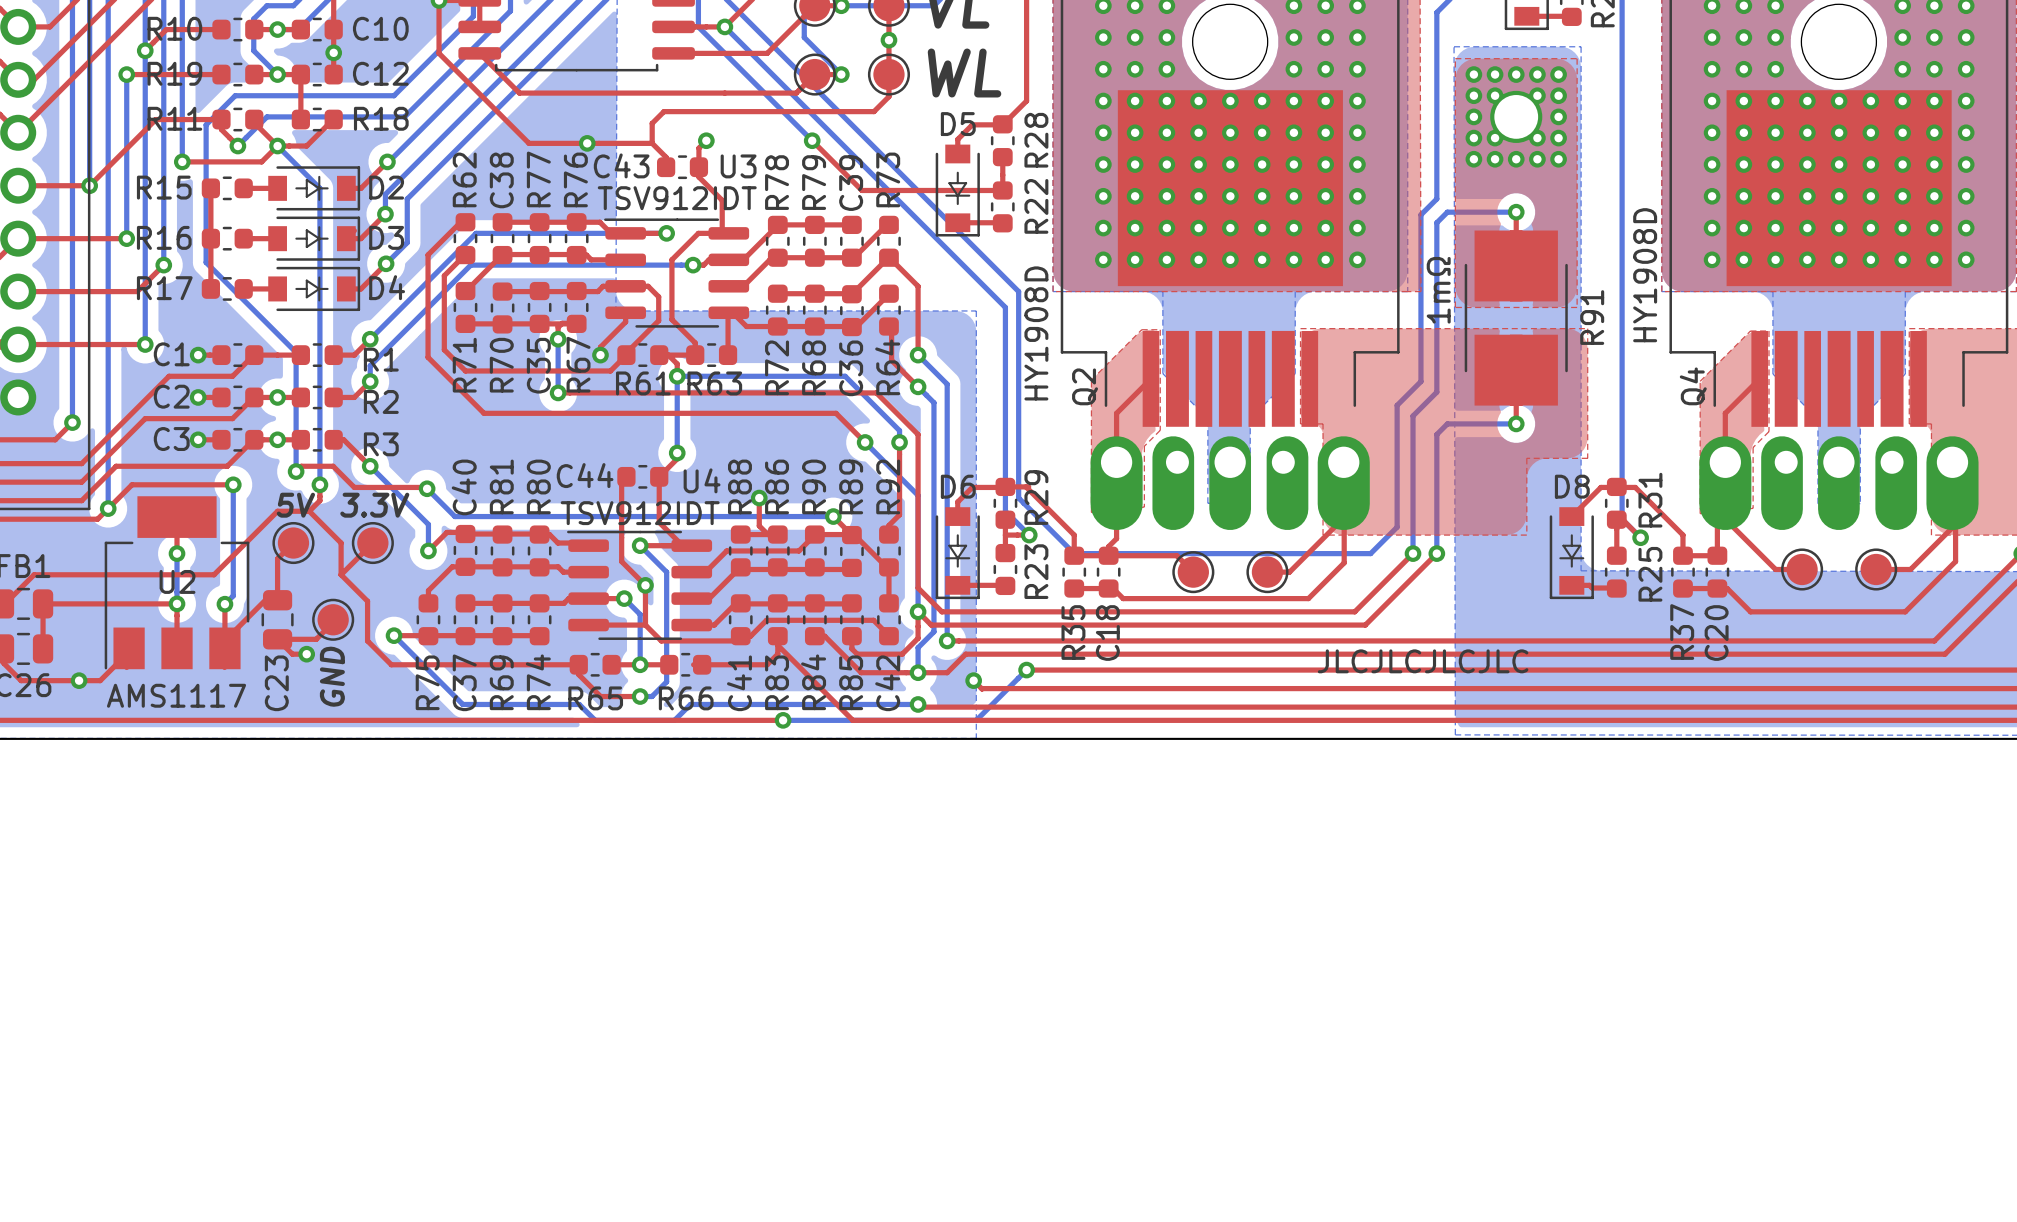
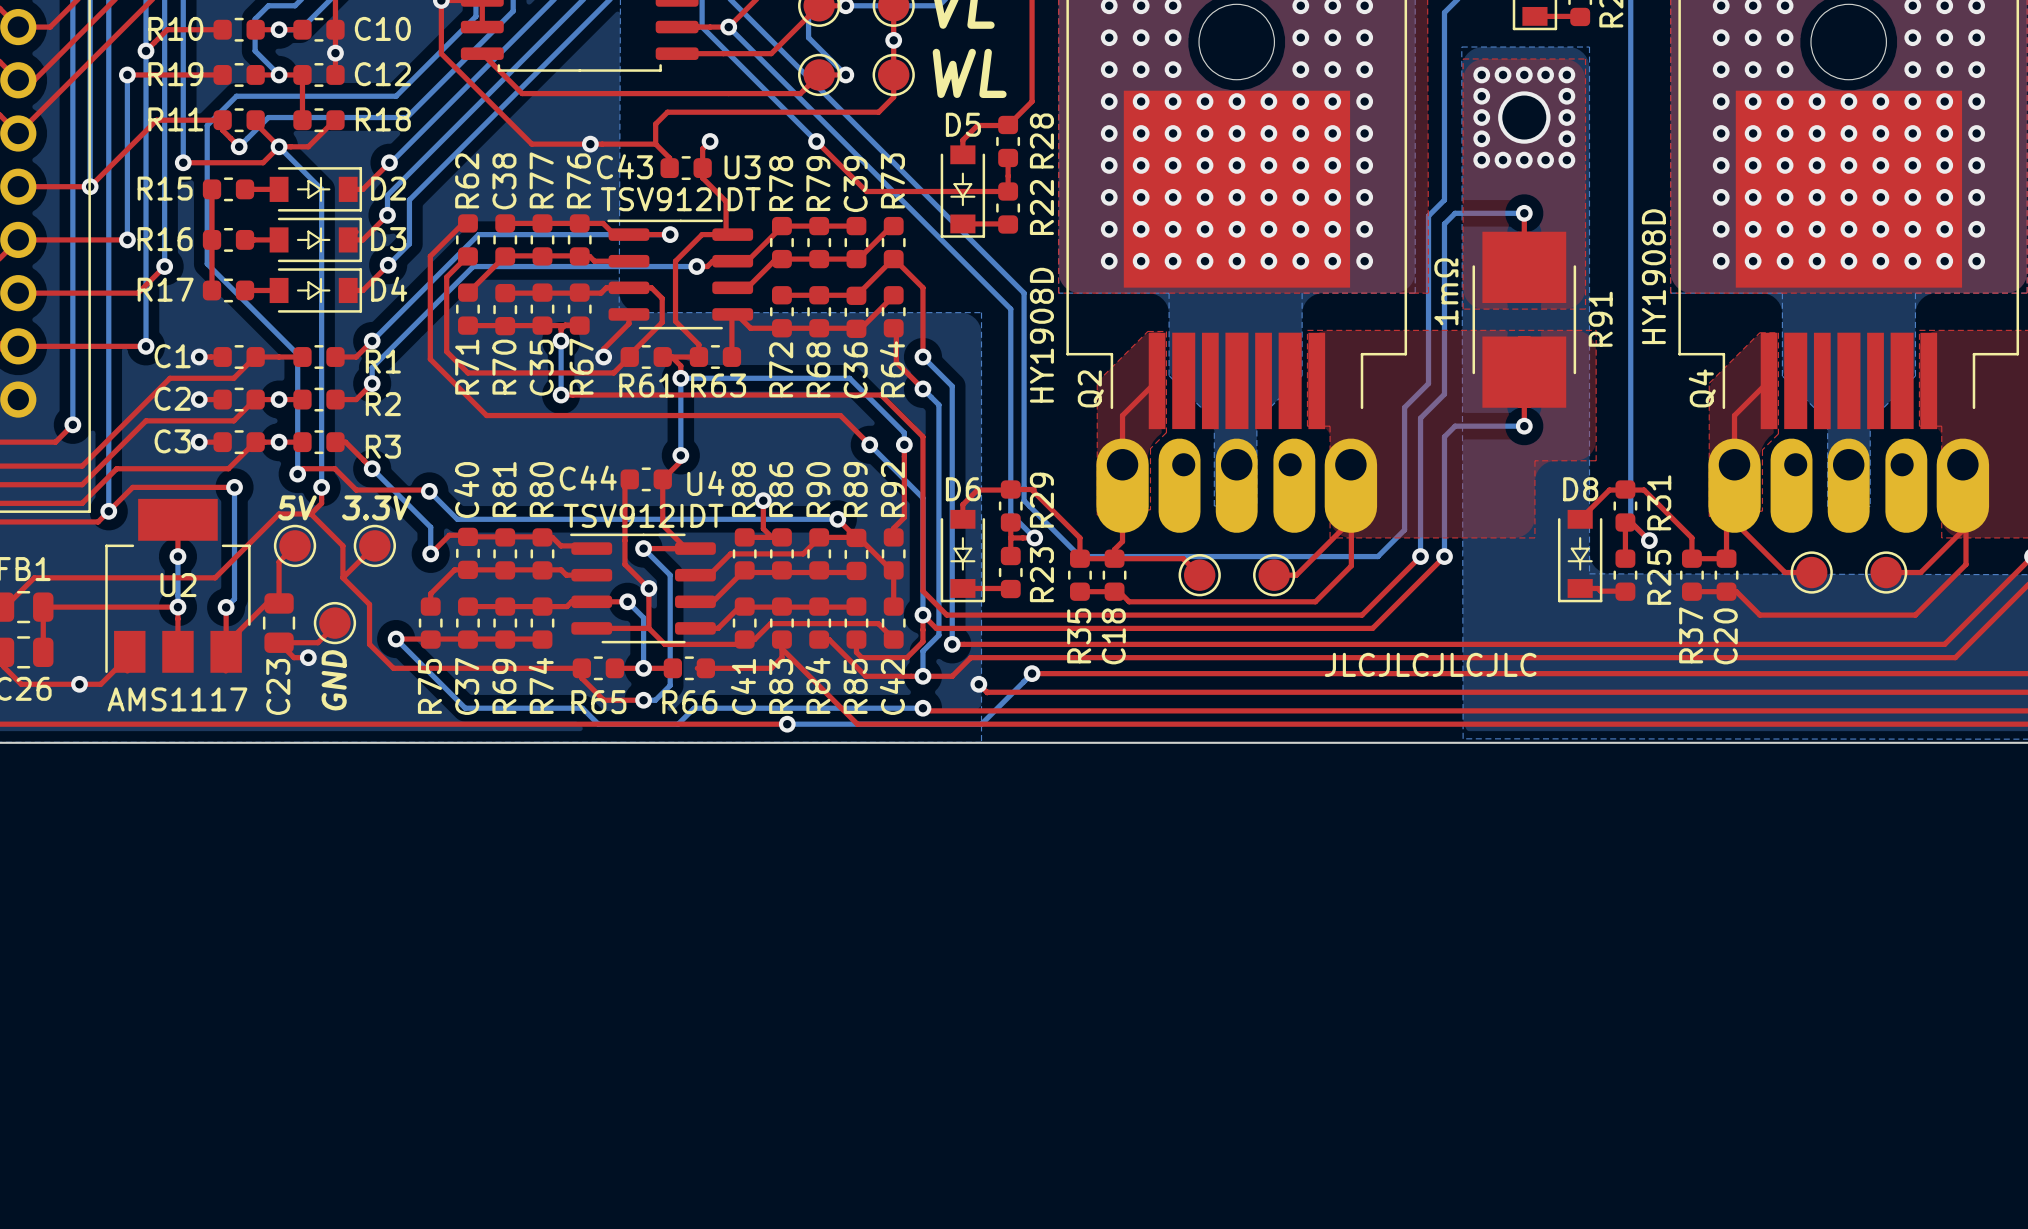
via: (1495, 95) -> none
via: (1537, 95) -> none
via: (1495, 138) -> none
via: (1537, 138) -> none

